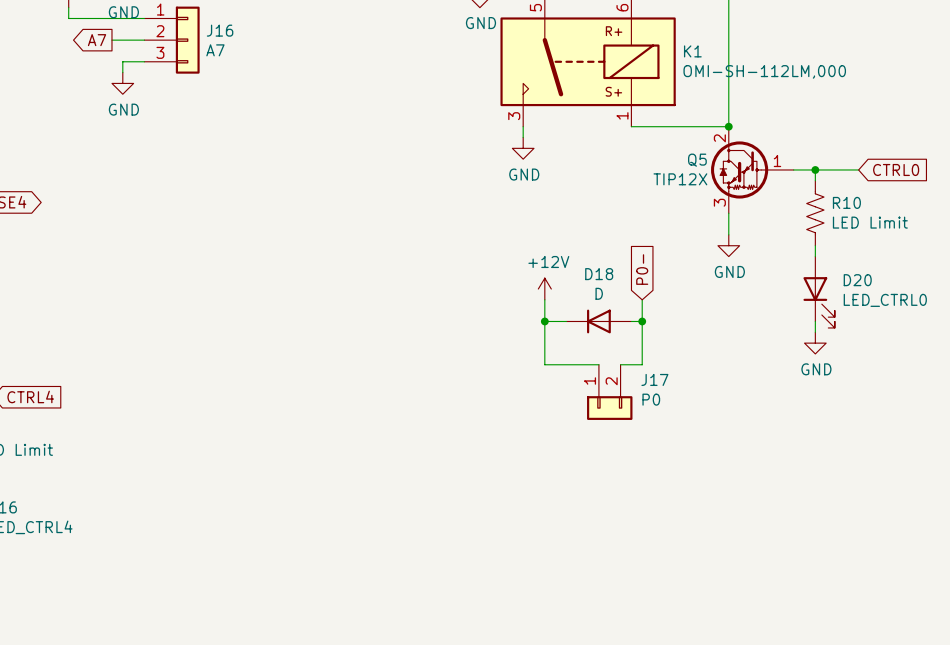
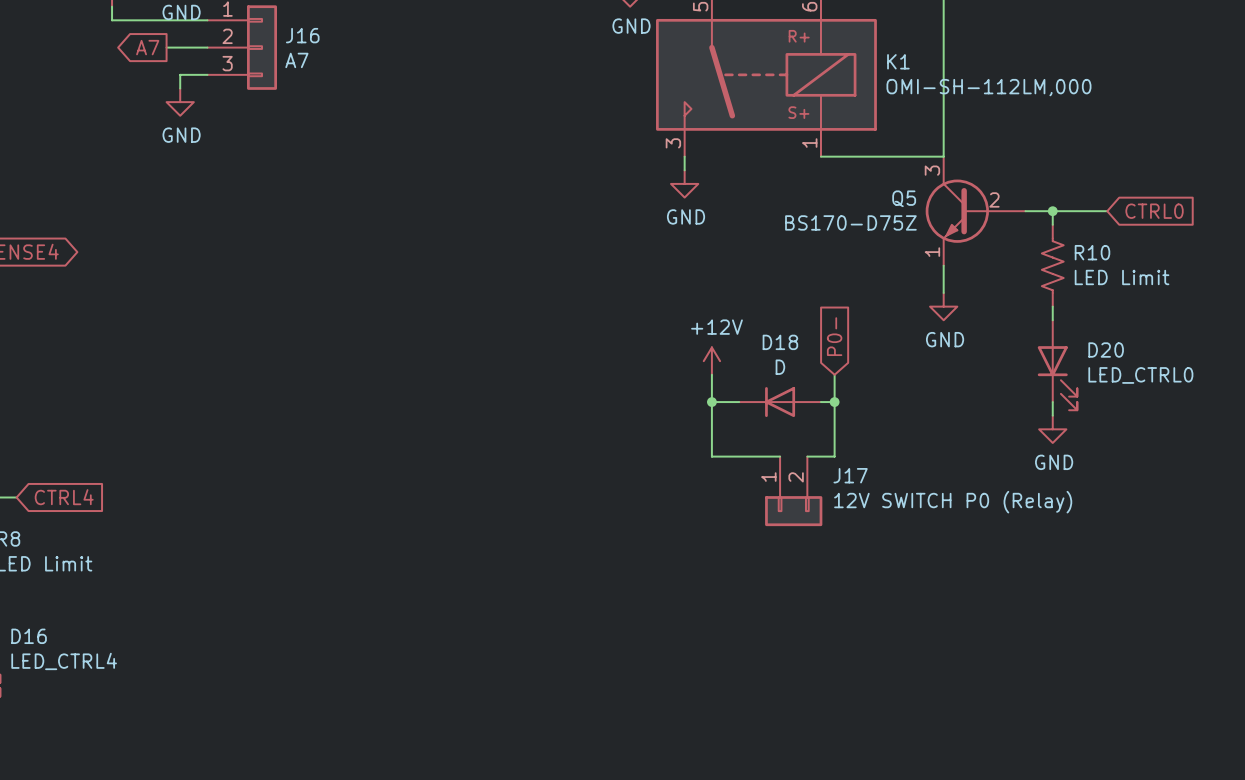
Q5 symbol: [711, 126, 794, 214] -> [925, 156, 1026, 266]
junction: (728, 126) -> none
Q5 value: TIP12X (680, 179) -> BS170-D75Z (850, 222)
J17 value: P0 (651, 399) -> 12V SWITCH P0 (Relay) (953, 502)

